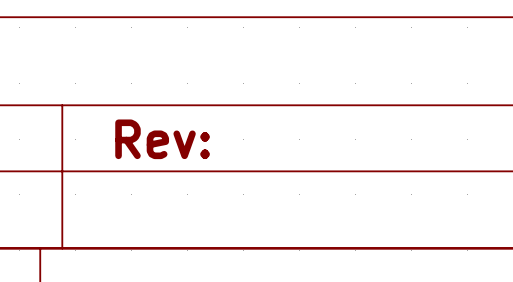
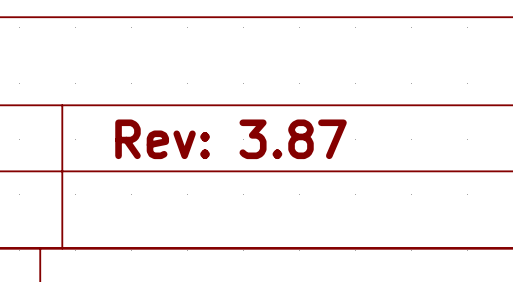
title block: Rev: (162, 139) -> Rev: 3.87 (231, 139)

